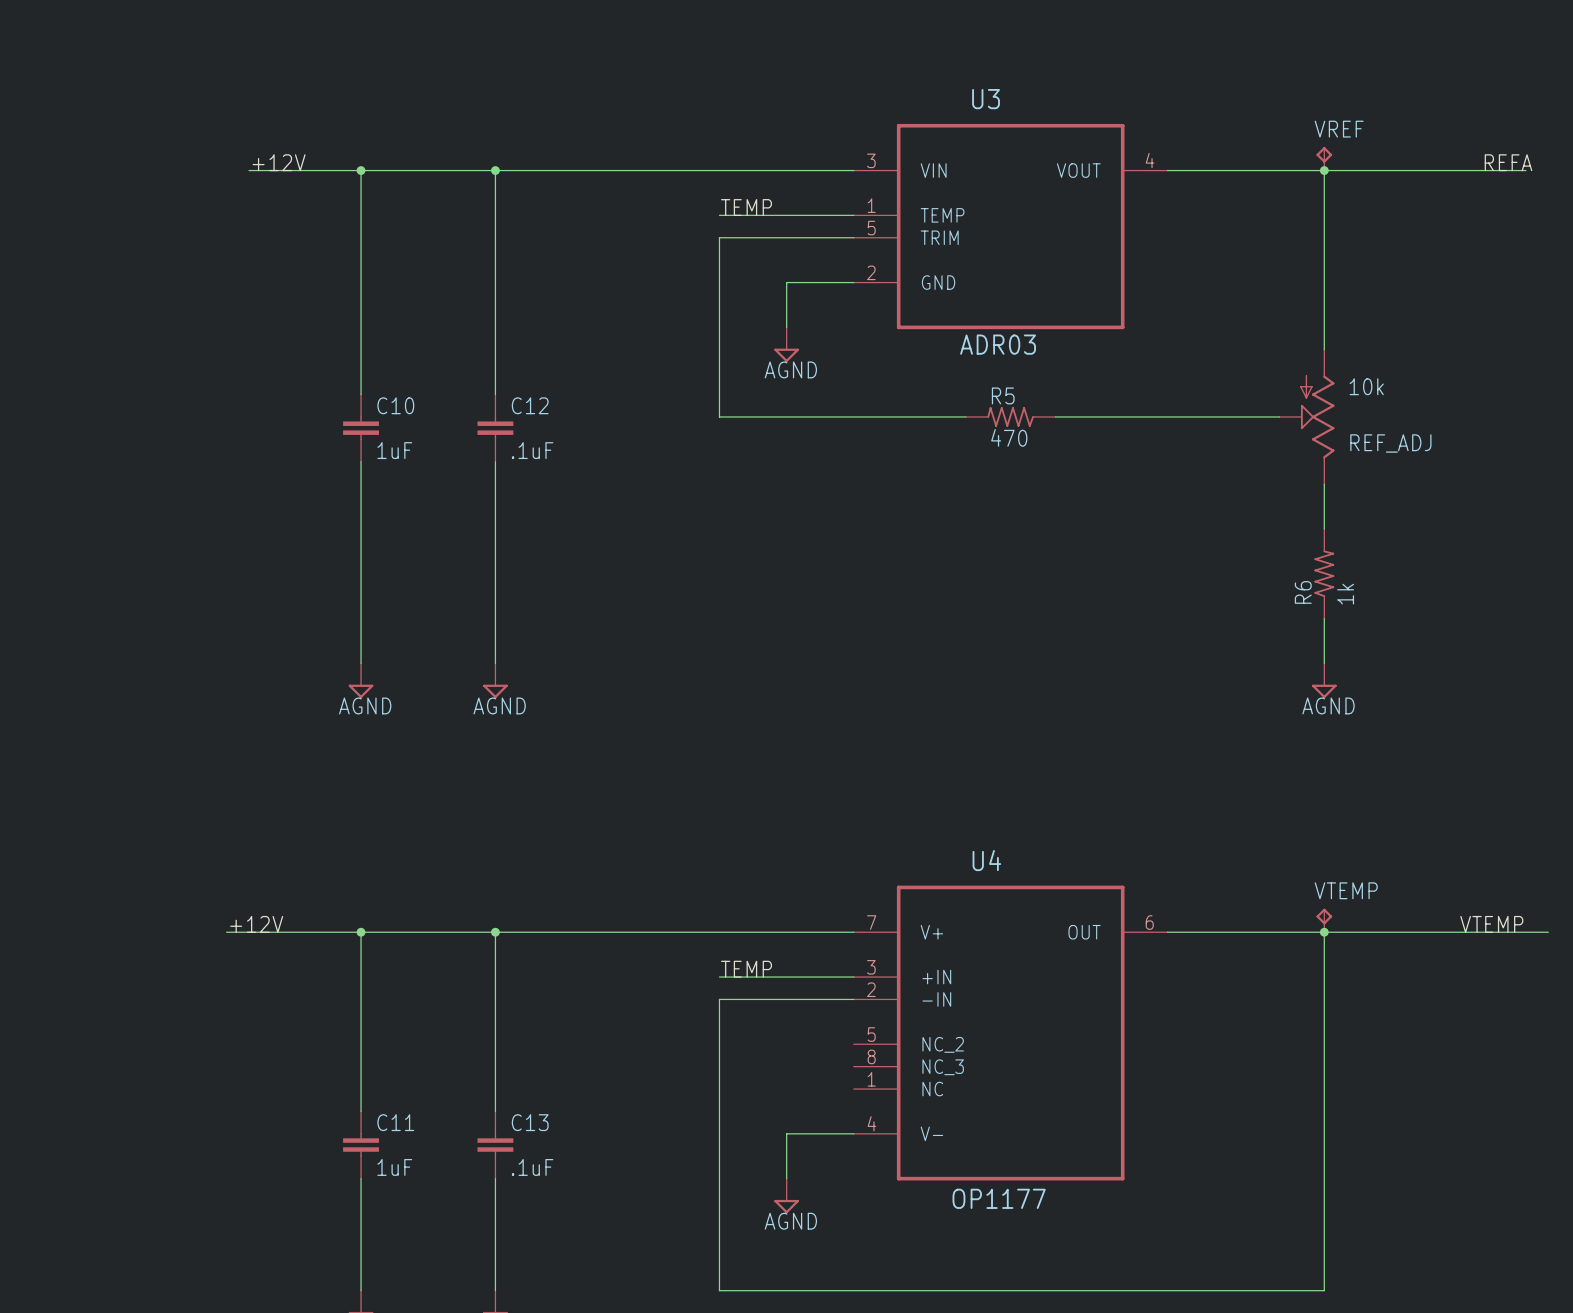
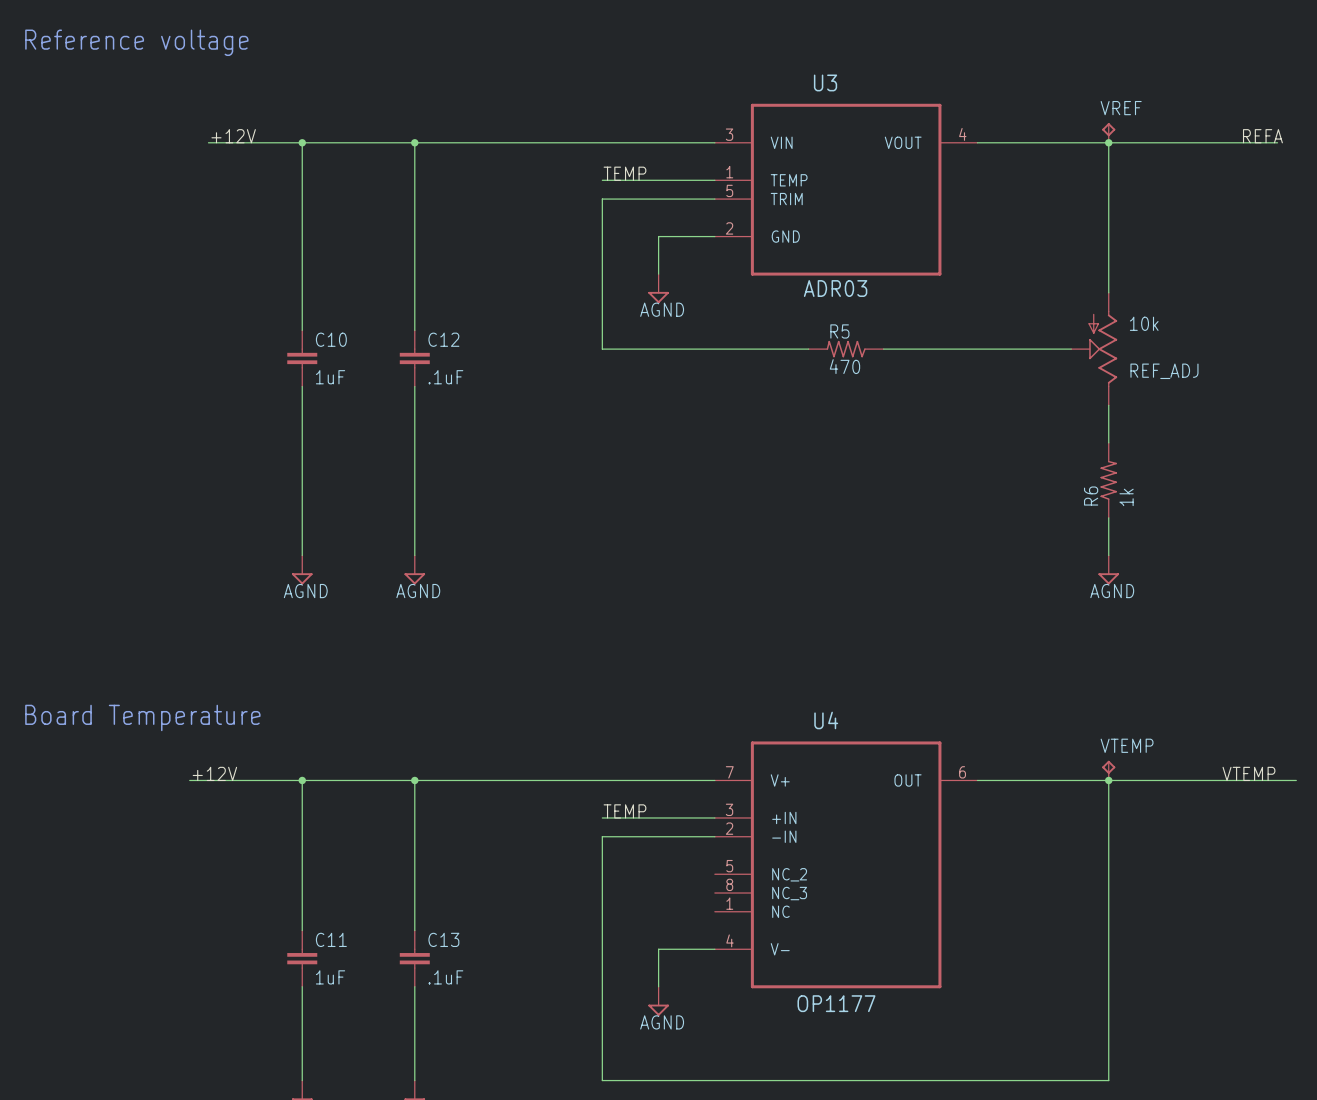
text: none -> Reference voltage (136, 42)
text: none -> Board Temperature (142, 717)

